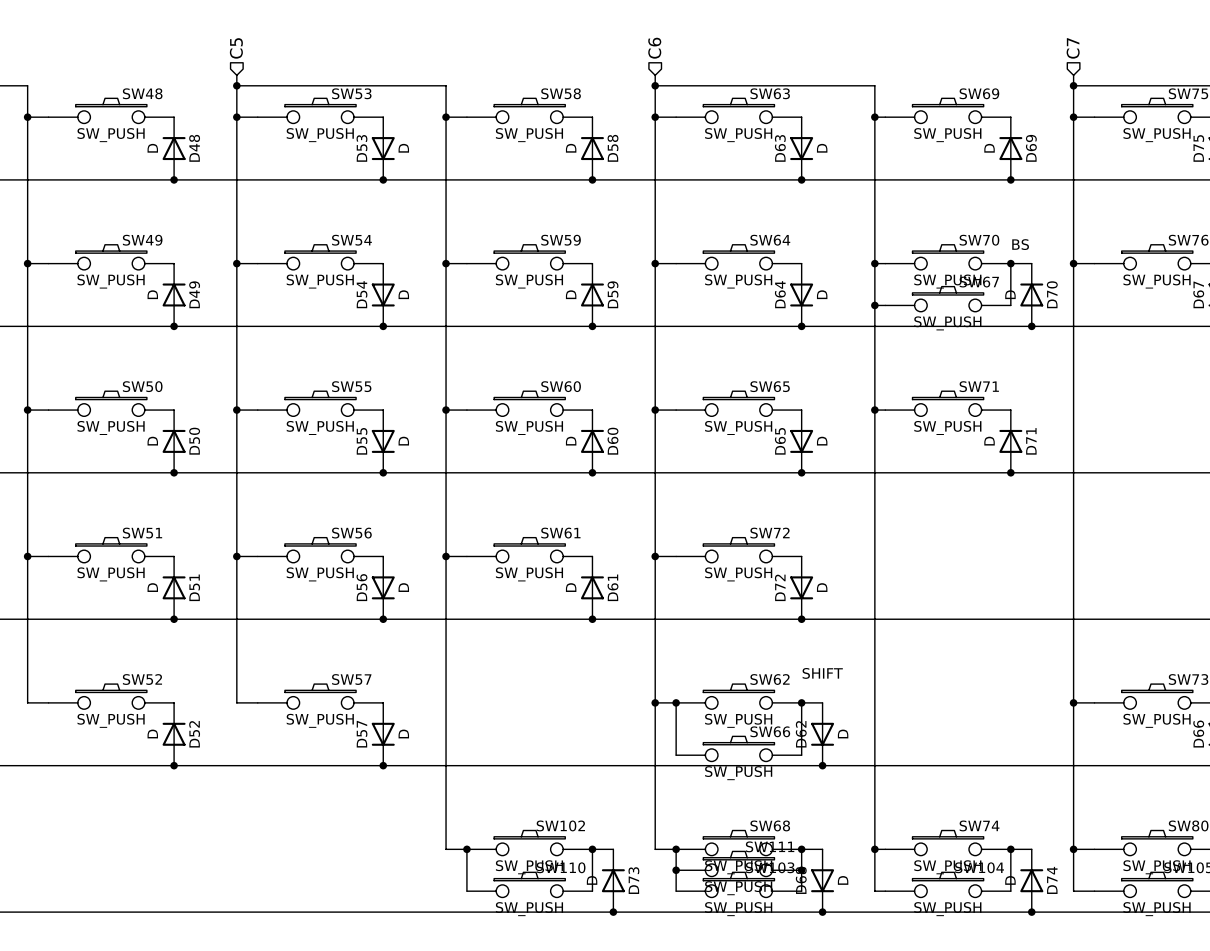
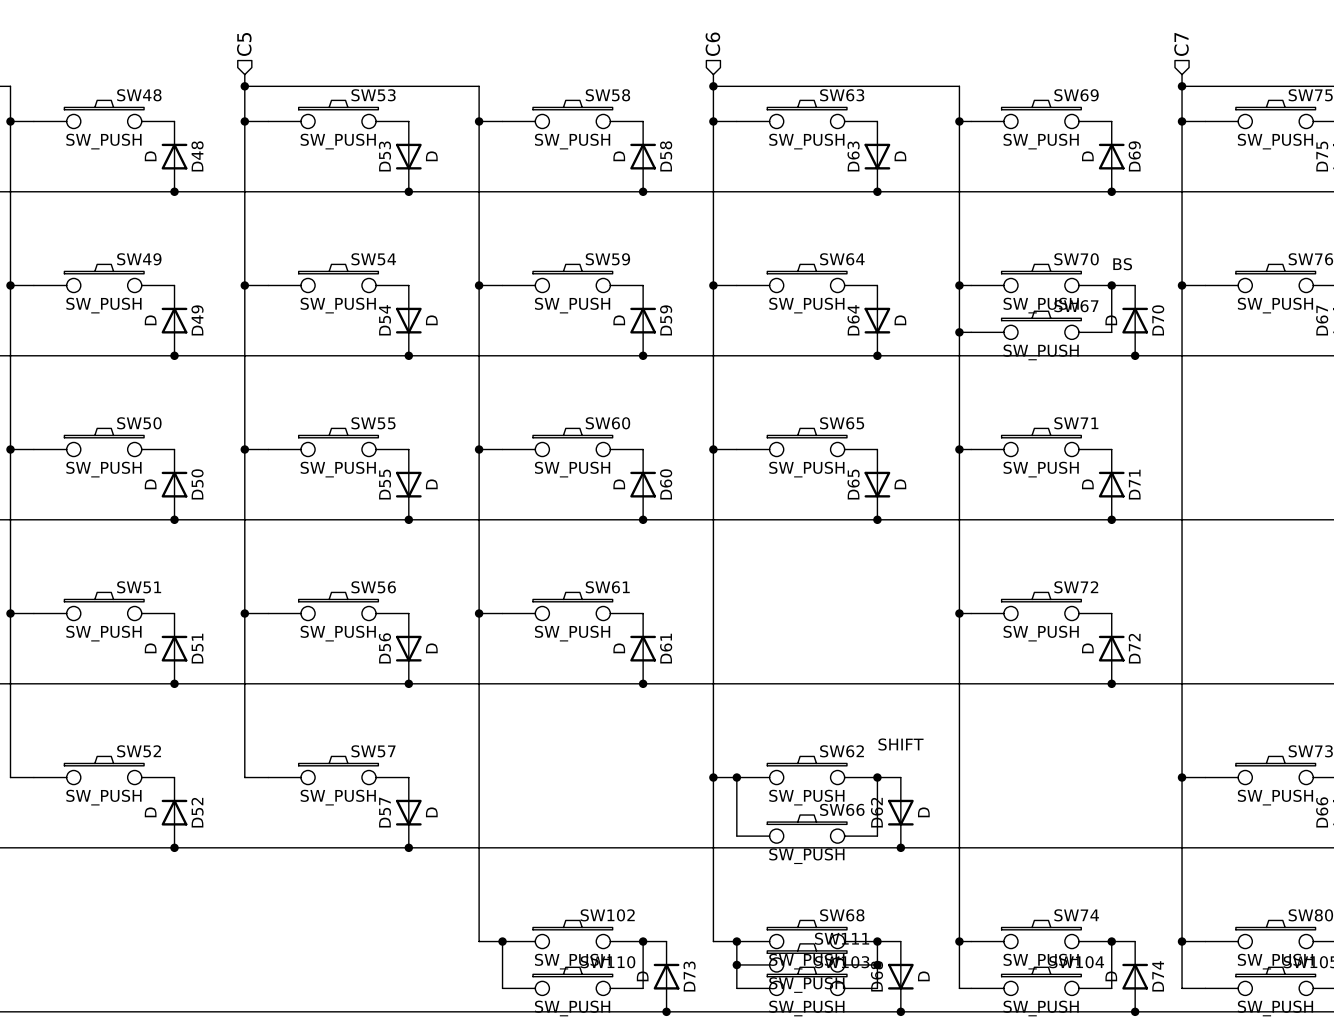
SW72 position: (738, 550) -> (1041, 606)
wire: (655, 556) (676, 556) -> none
junction: (655, 556) -> none
wire: none -> (959, 613) (971, 613)
junction: none -> (959, 613)
D72 rotation: 0° (801, 587) -> 180° (1111, 648)
D72 position: (801, 587) -> (1111, 648)
junction: (801, 619) -> none
junction: none -> (1111, 683)

